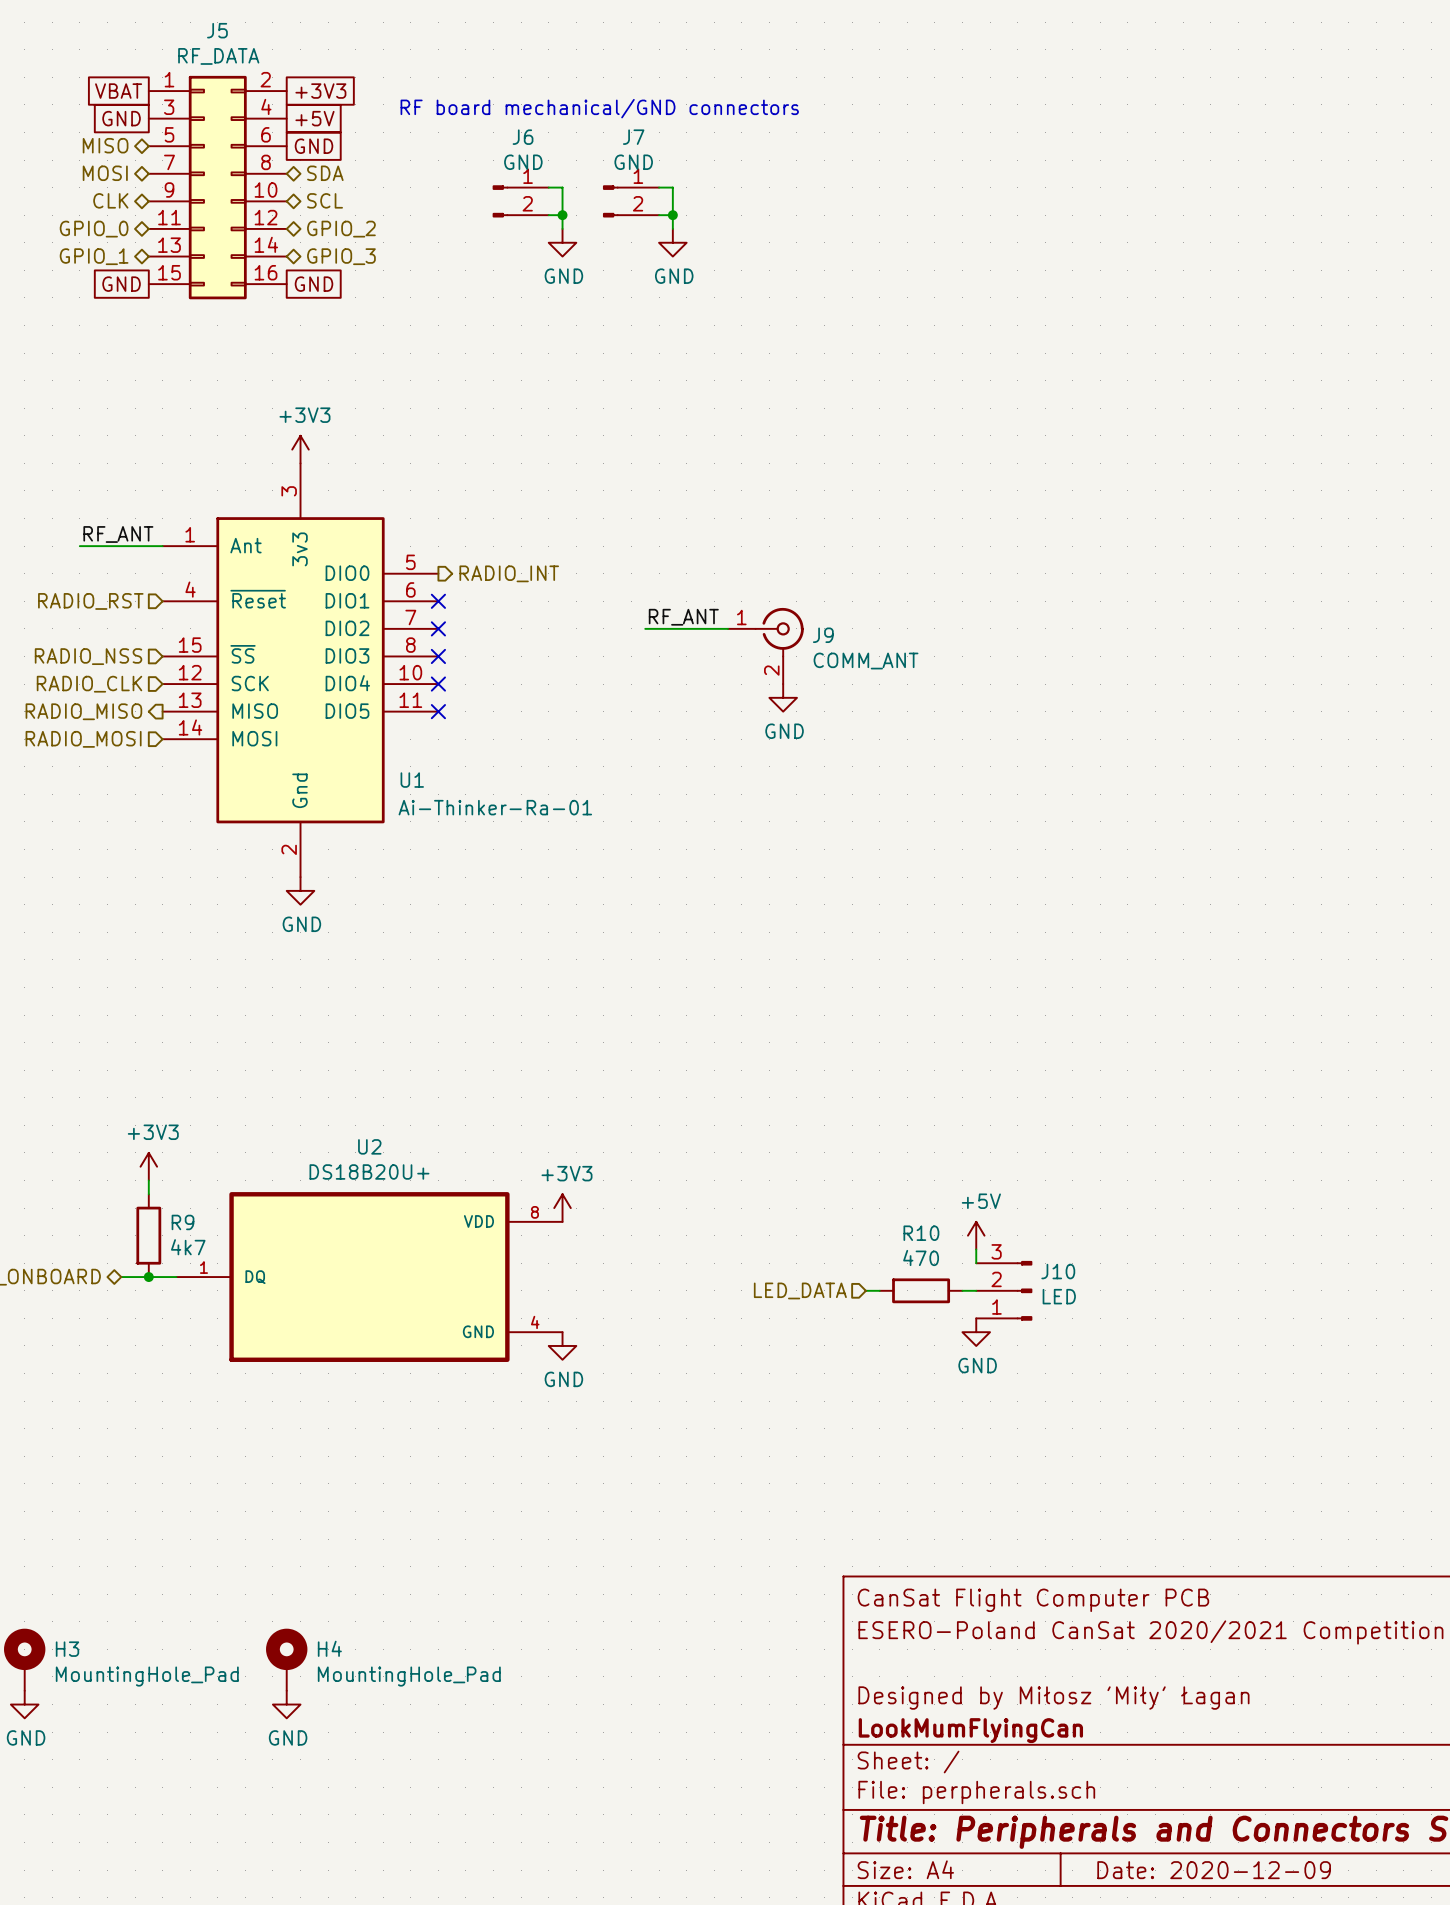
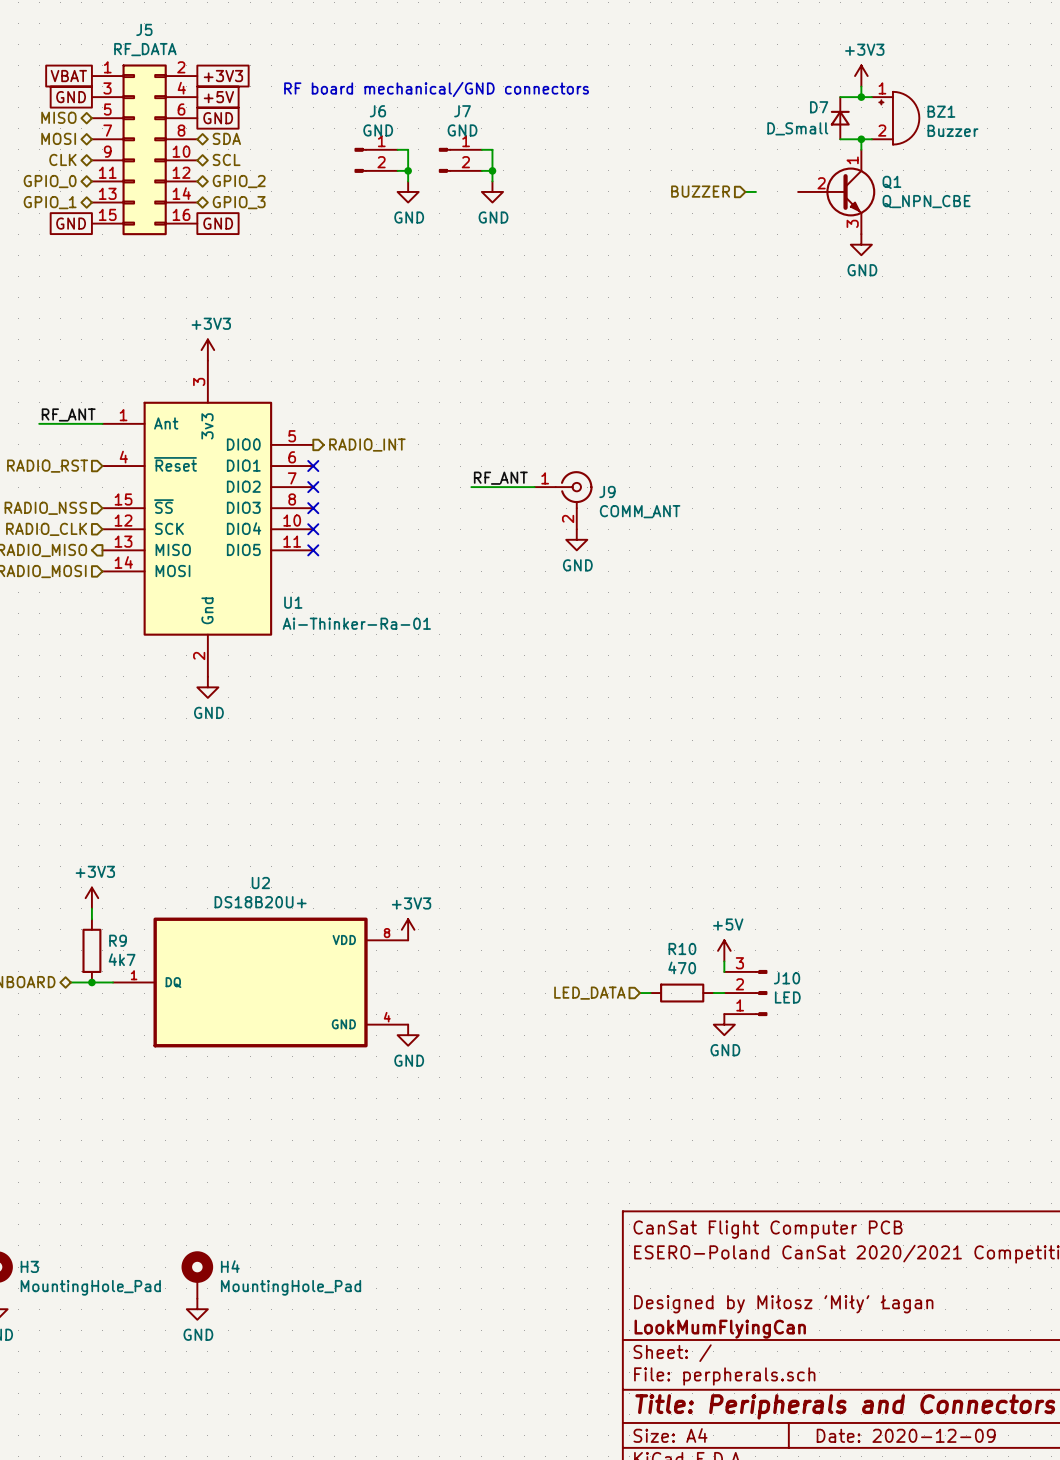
power symbol: none -> +3V3 (861, 76)
wire: none -> (861, 86) (861, 97)
wire: none -> (840, 97) (871, 97)
junction: none -> (861, 97)
D7: none -> D_Small (840, 118)
BZ1: none -> Buzzer (895, 118)
wire: none -> (840, 139) (871, 139)
wire: none -> (861, 139) (861, 149)
junction: none -> (861, 139)
hierarchical label: none -> BUZZER (700, 191)
wire: none -> (745, 191) (755, 191)
Q1: none -> Q_NPN_CBE (836, 191)
power symbol: none -> GND (861, 244)

